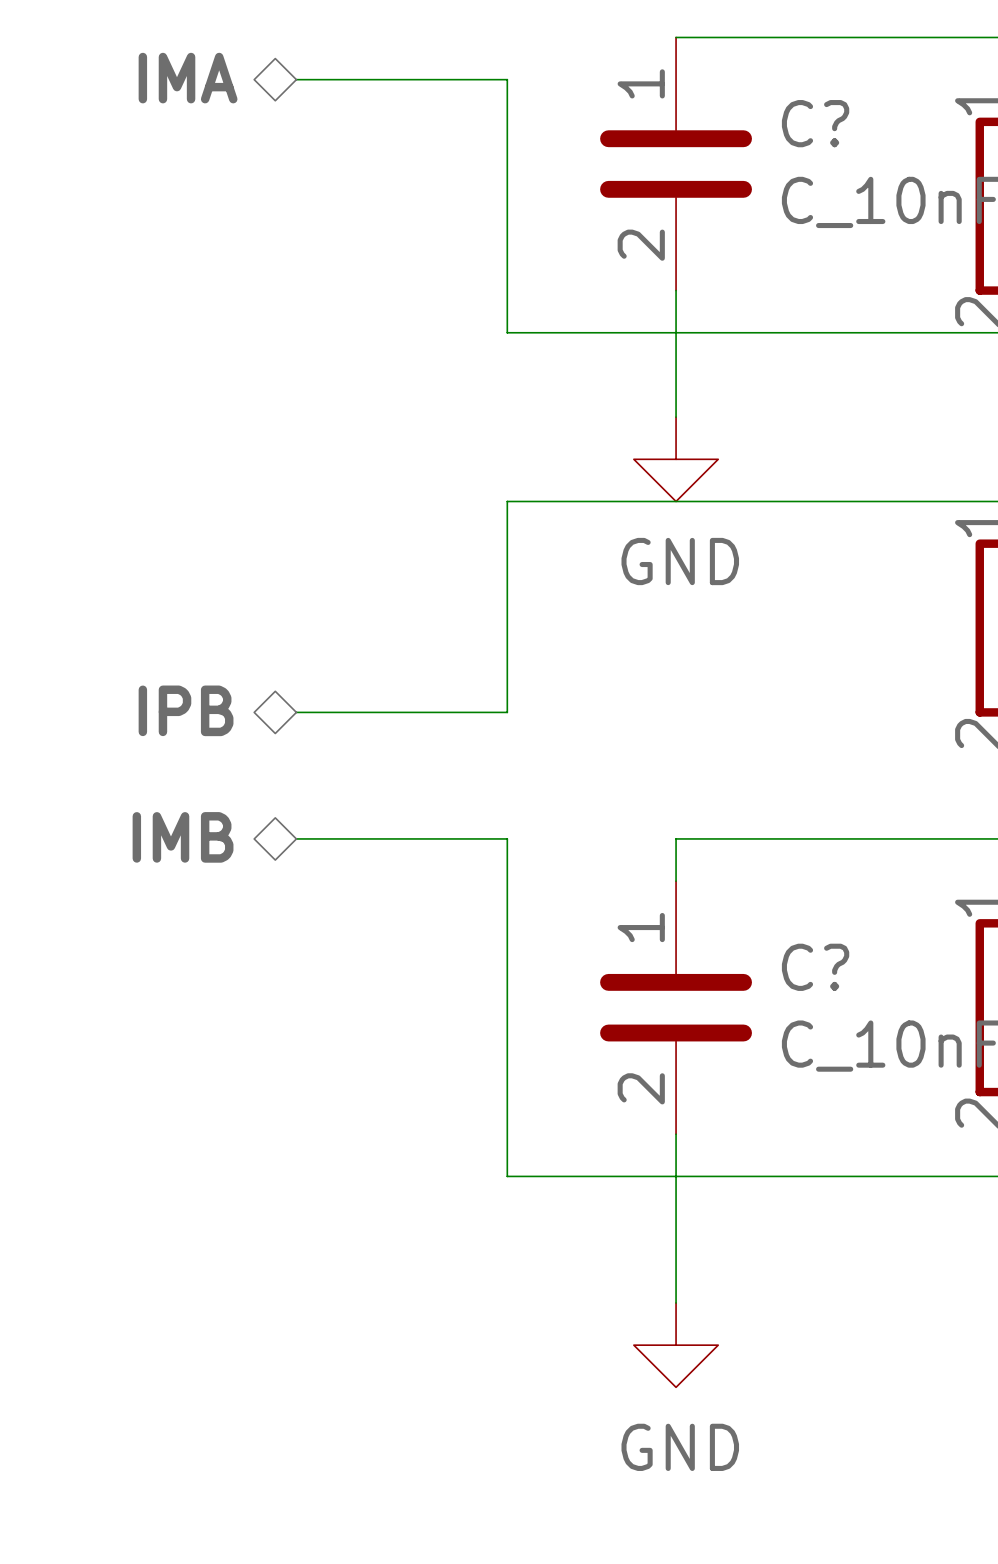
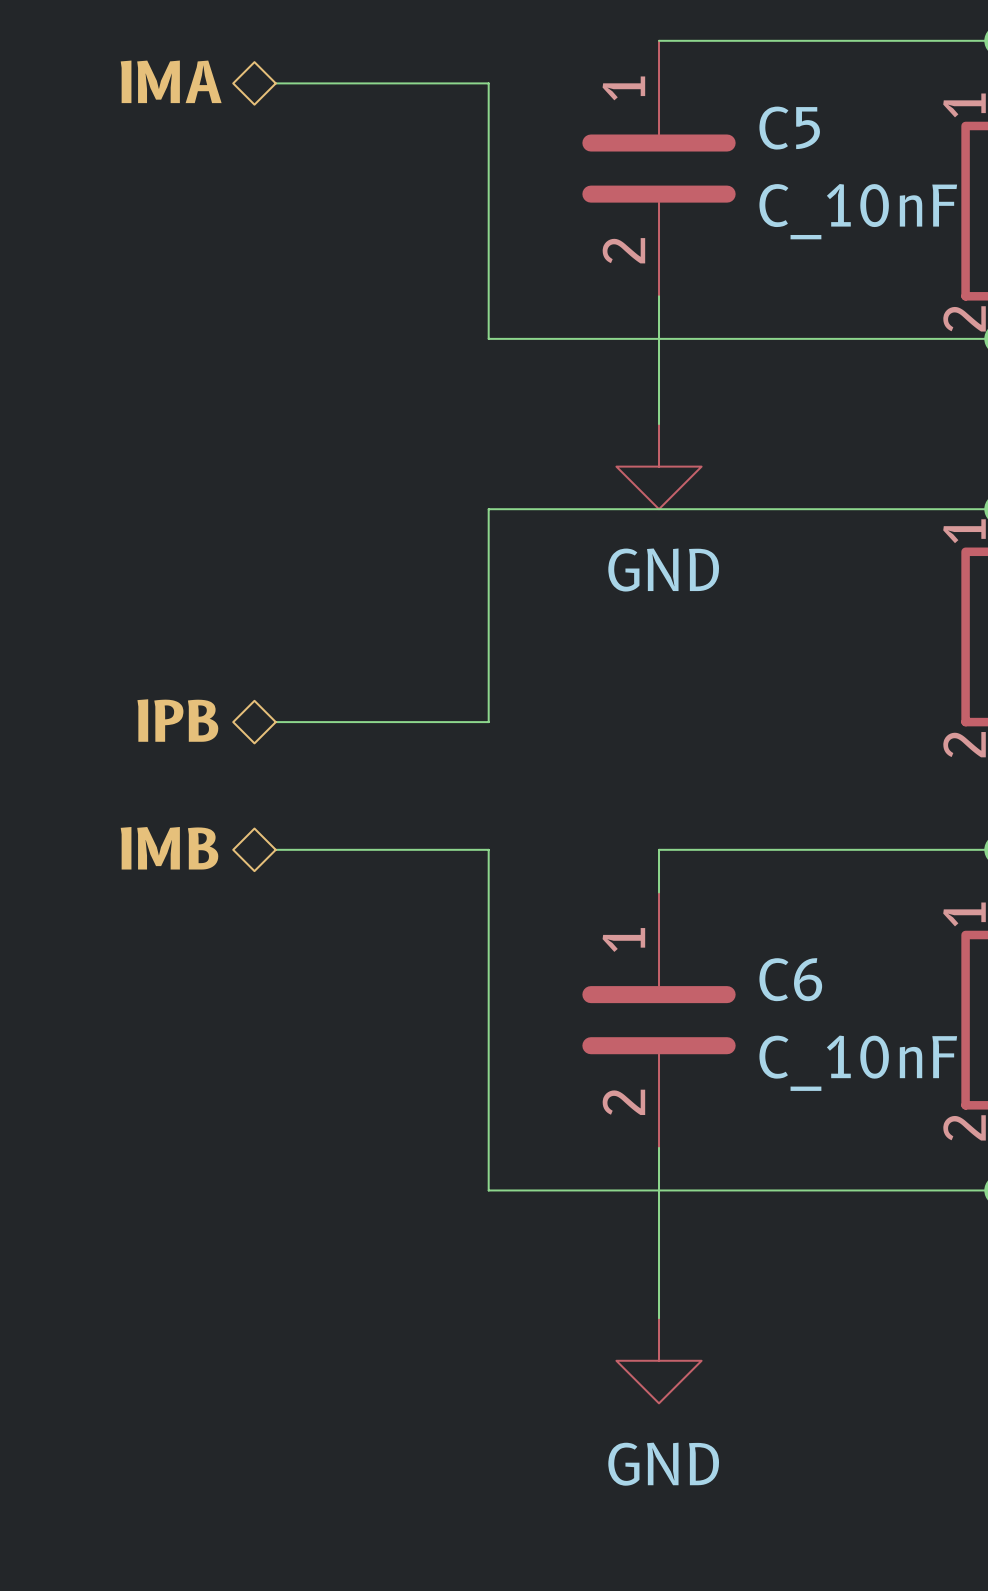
C? name: C? (815, 123) -> C5 (789, 128)
C? name: C? (815, 967) -> C6 (790, 979)

